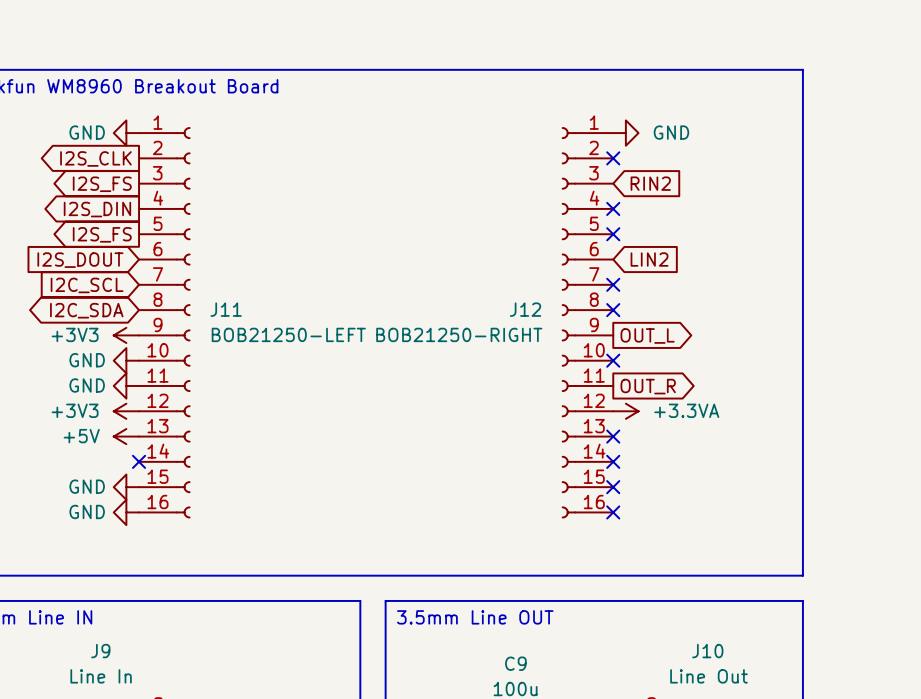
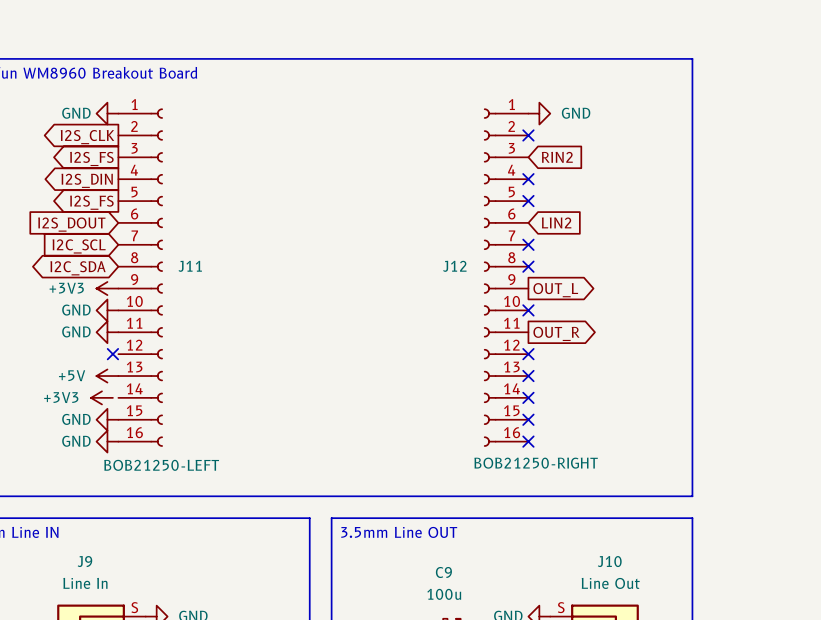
J11 value position: BOB21250-LEFT (288, 334) -> BOB21250-LEFT (161, 465)
J12 value position: BOB21250-RIGHT (459, 334) -> BOB21250-RIGHT (536, 463)
power symbol position: +3V3 (126, 411) -> +3V3 (101, 397)
no-connect mark: none -> (528, 354)
power symbol: +3.3VA (625, 411) -> none
no-connect mark position: (139, 461) -> (112, 354)

